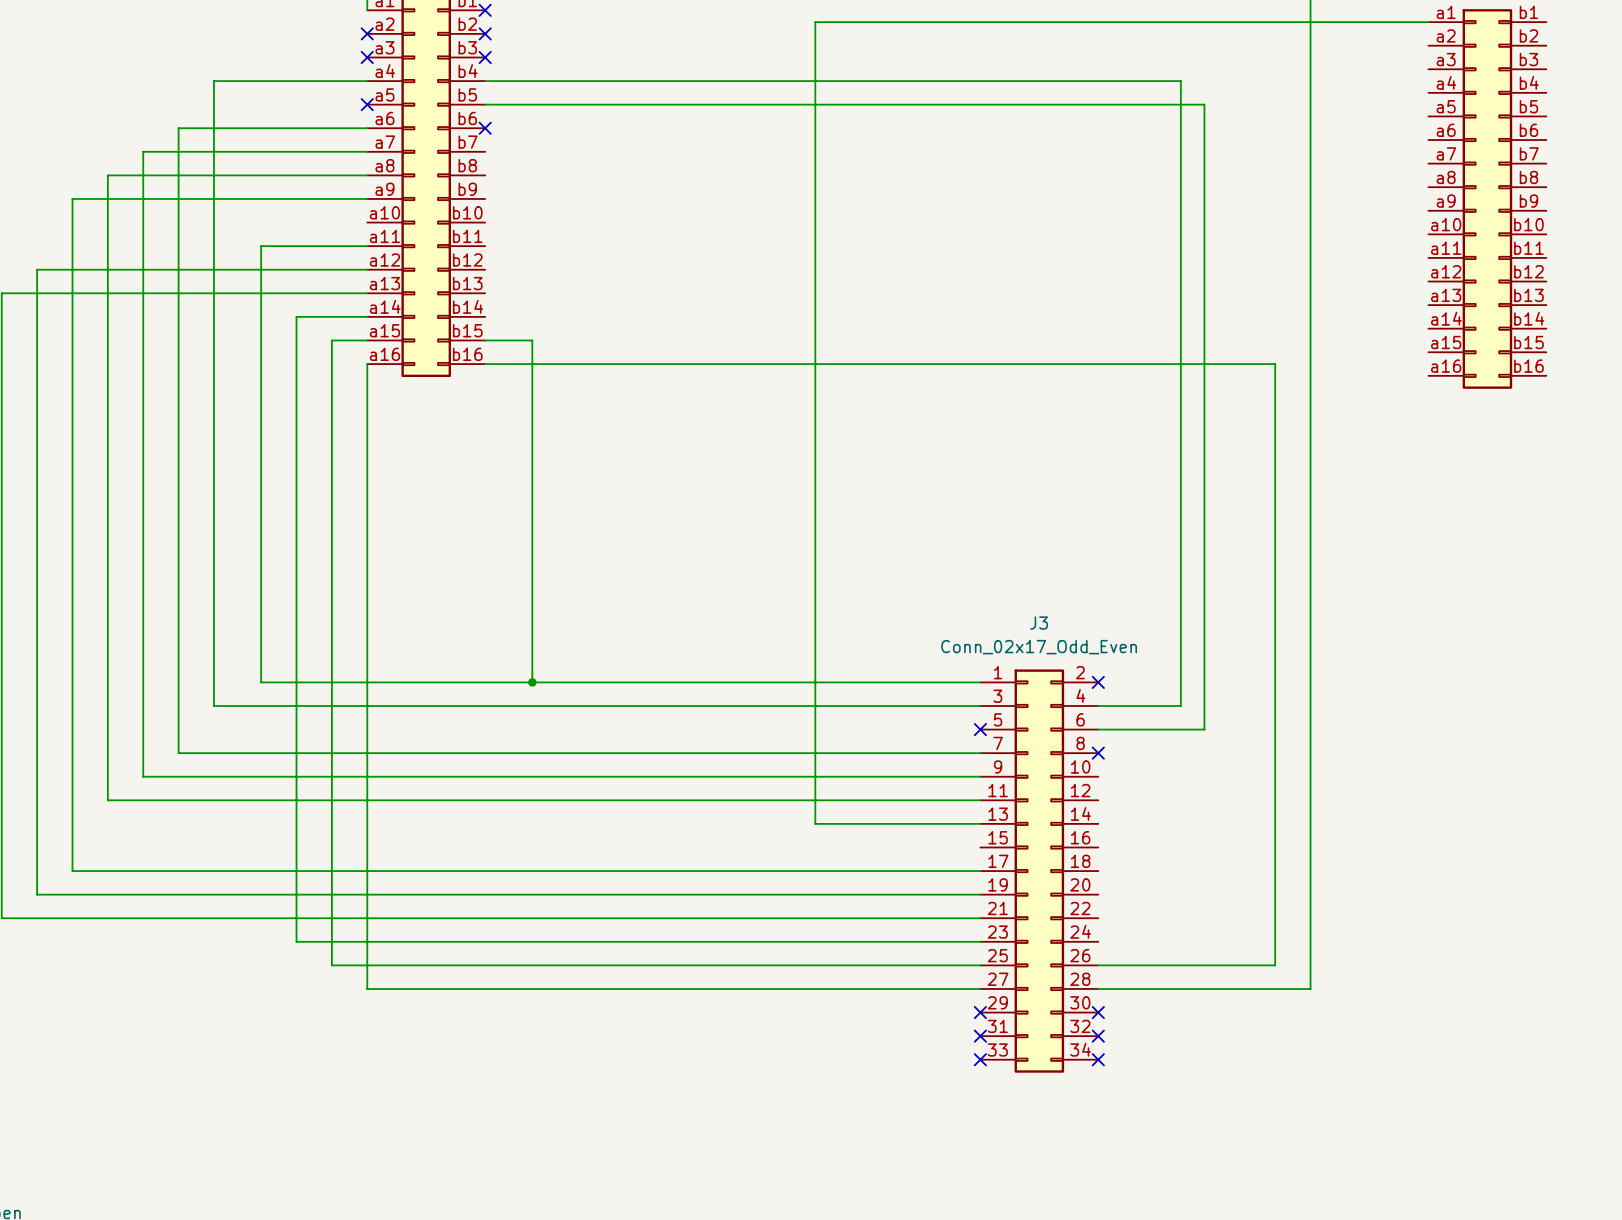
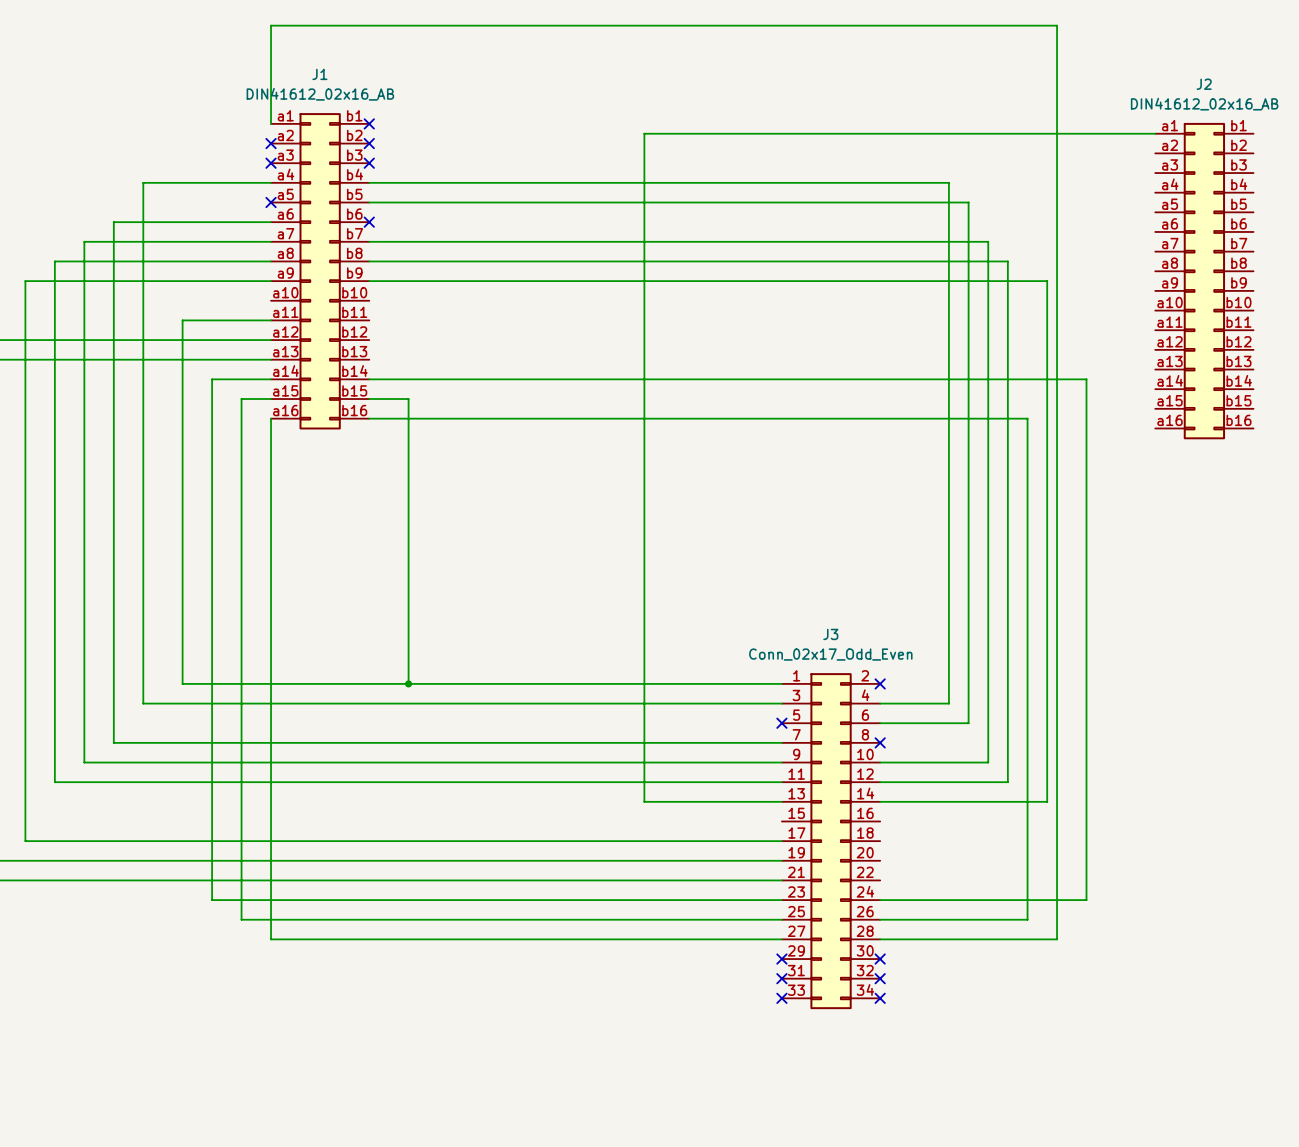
wire: none -> (369, 241) (988, 241) (988, 762) (880, 762)
wire: none -> (369, 261) (1007, 261) (1007, 782) (880, 782)
wire: none -> (369, 281) (1047, 281) (1047, 801) (880, 801)
wire: none -> (369, 379) (1086, 379) (1086, 900) (880, 900)

